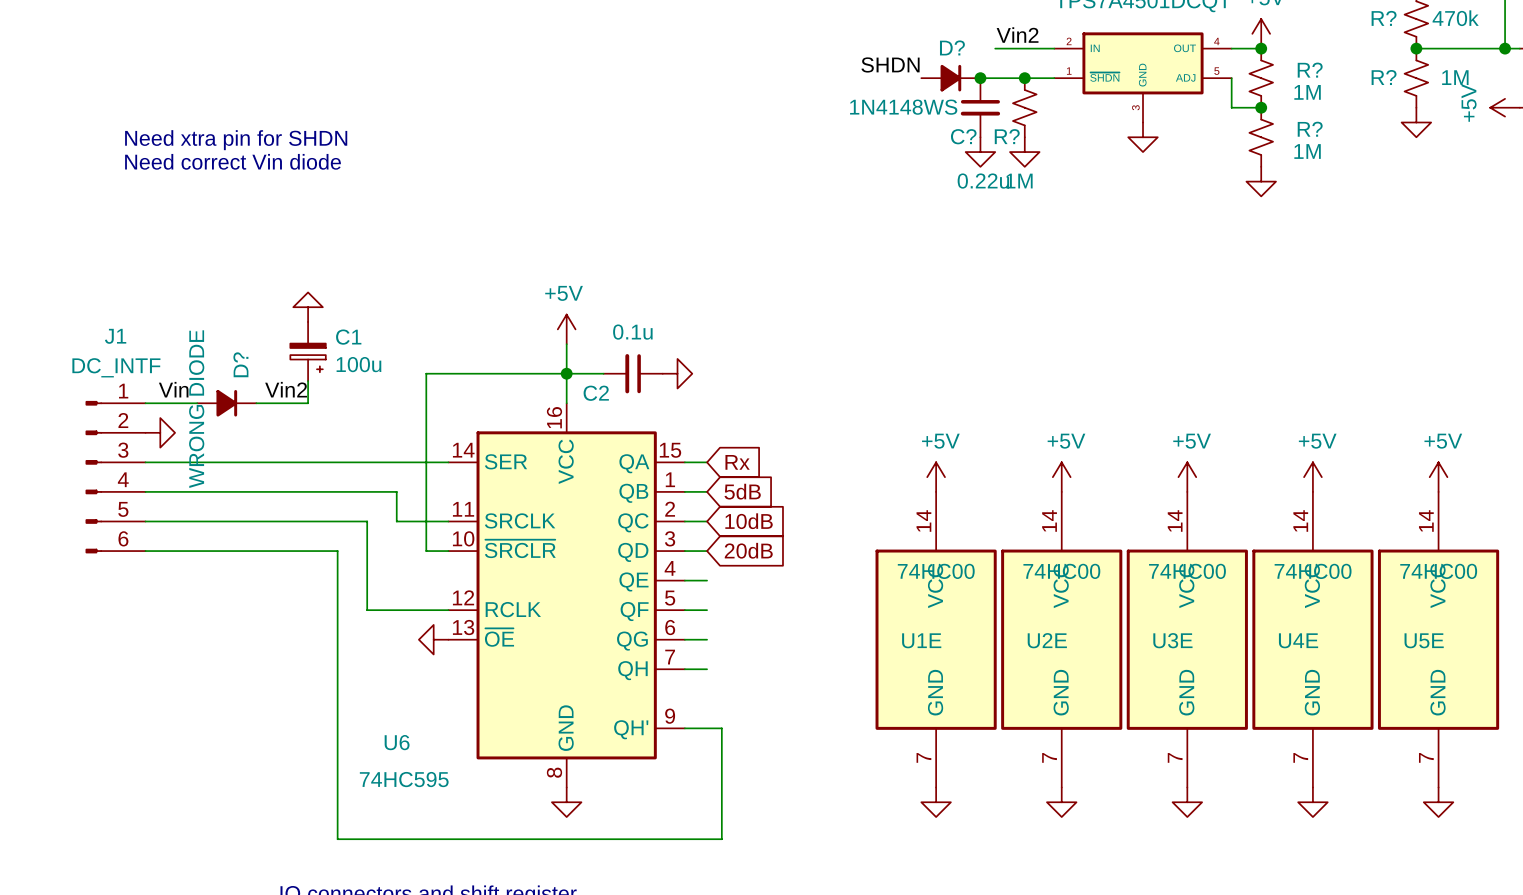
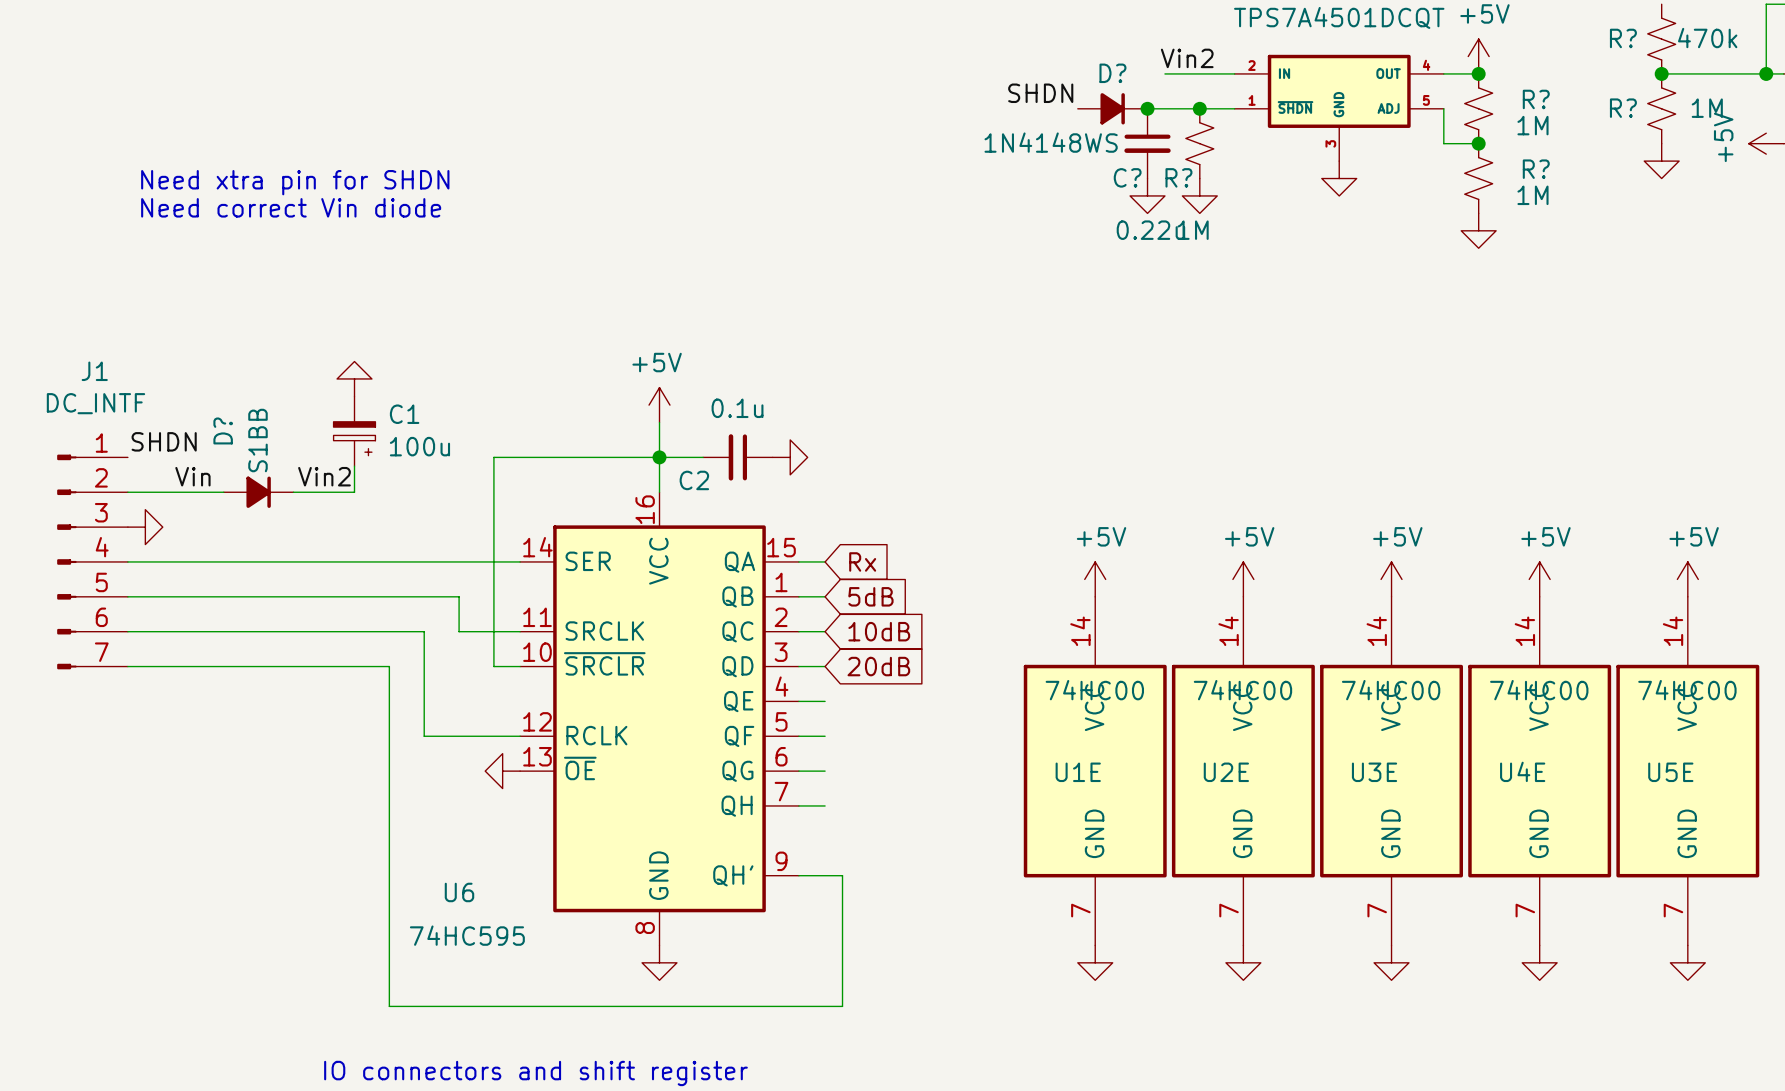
label: none -> SHDN (164, 441)
D? name position: D? (240, 364) -> D? (223, 430)
J1 value position: DC_INTF (116, 367) -> DC_INTF (95, 403)
J1 symbol: [85, 400, 146, 554] -> [57, 454, 128, 670]
D? value: WRONG DIODE (196, 409) -> S1BB (257, 440)
power symbol position: (160, 432) -> (145, 527)

